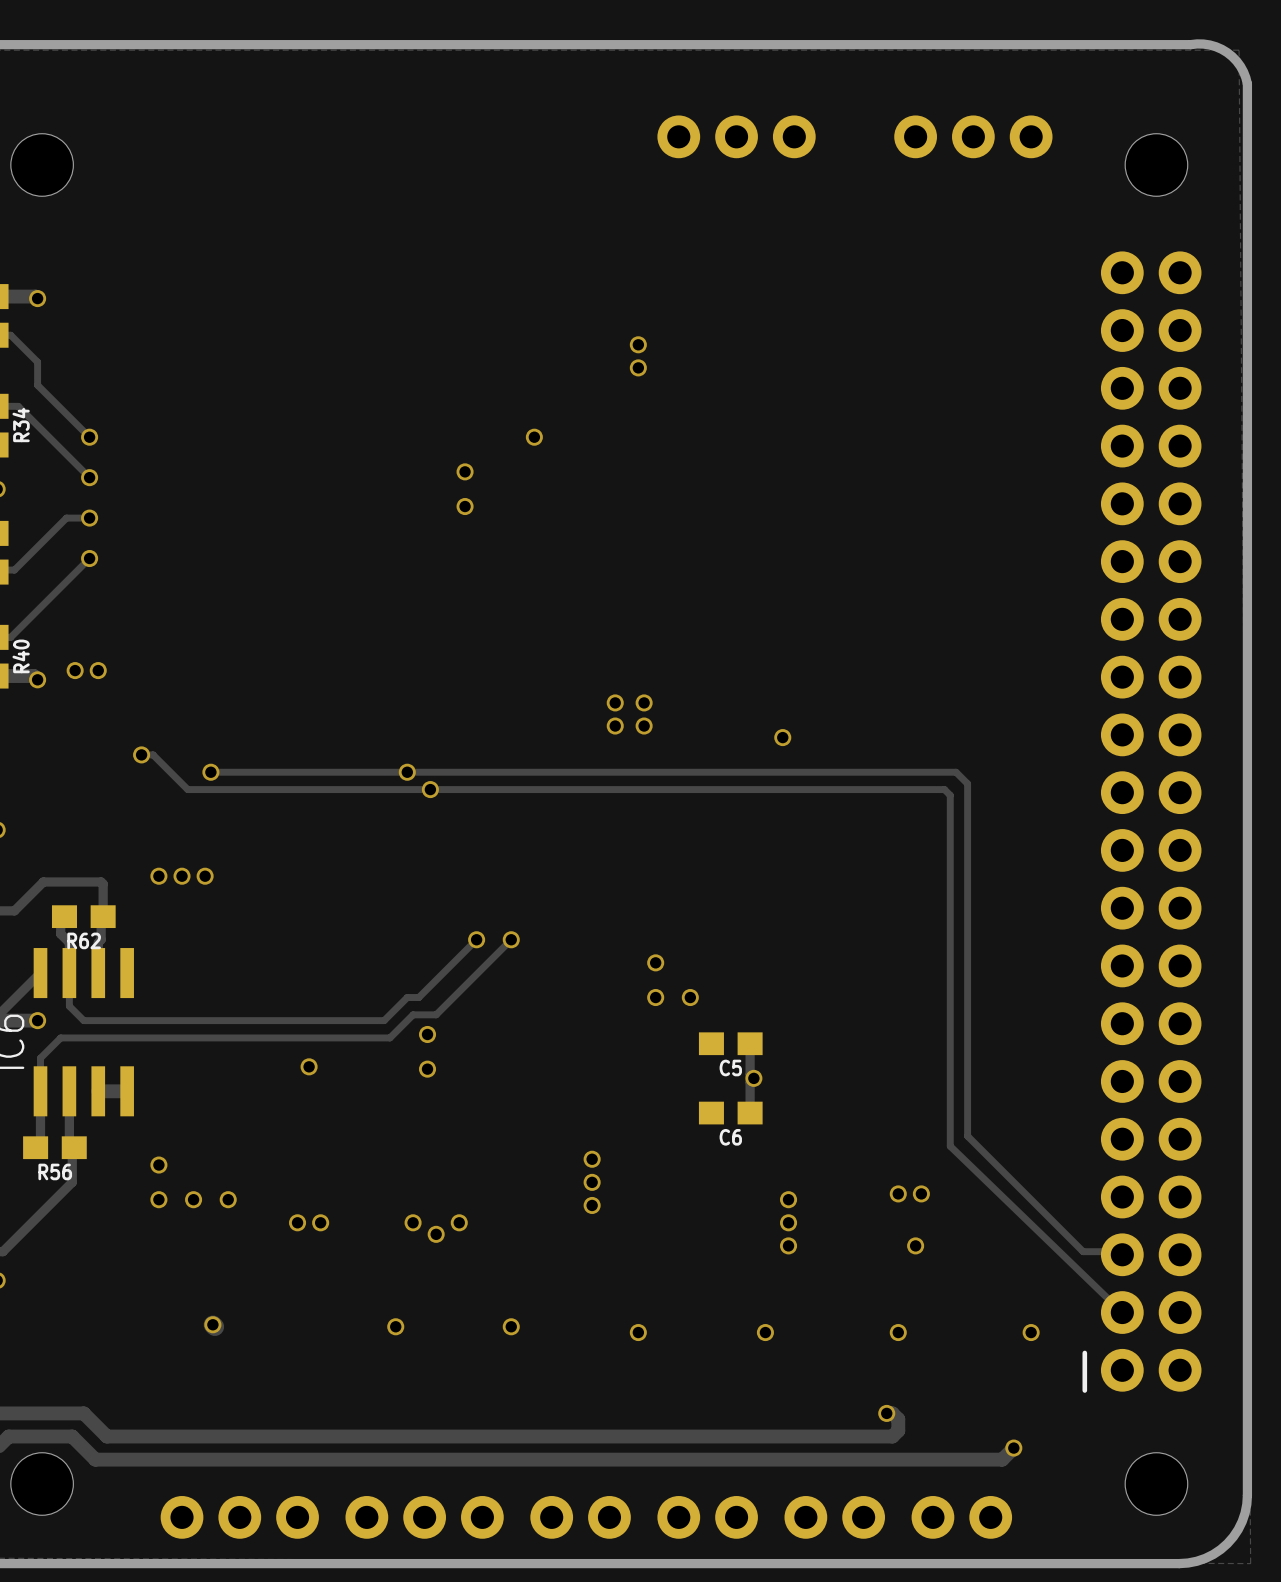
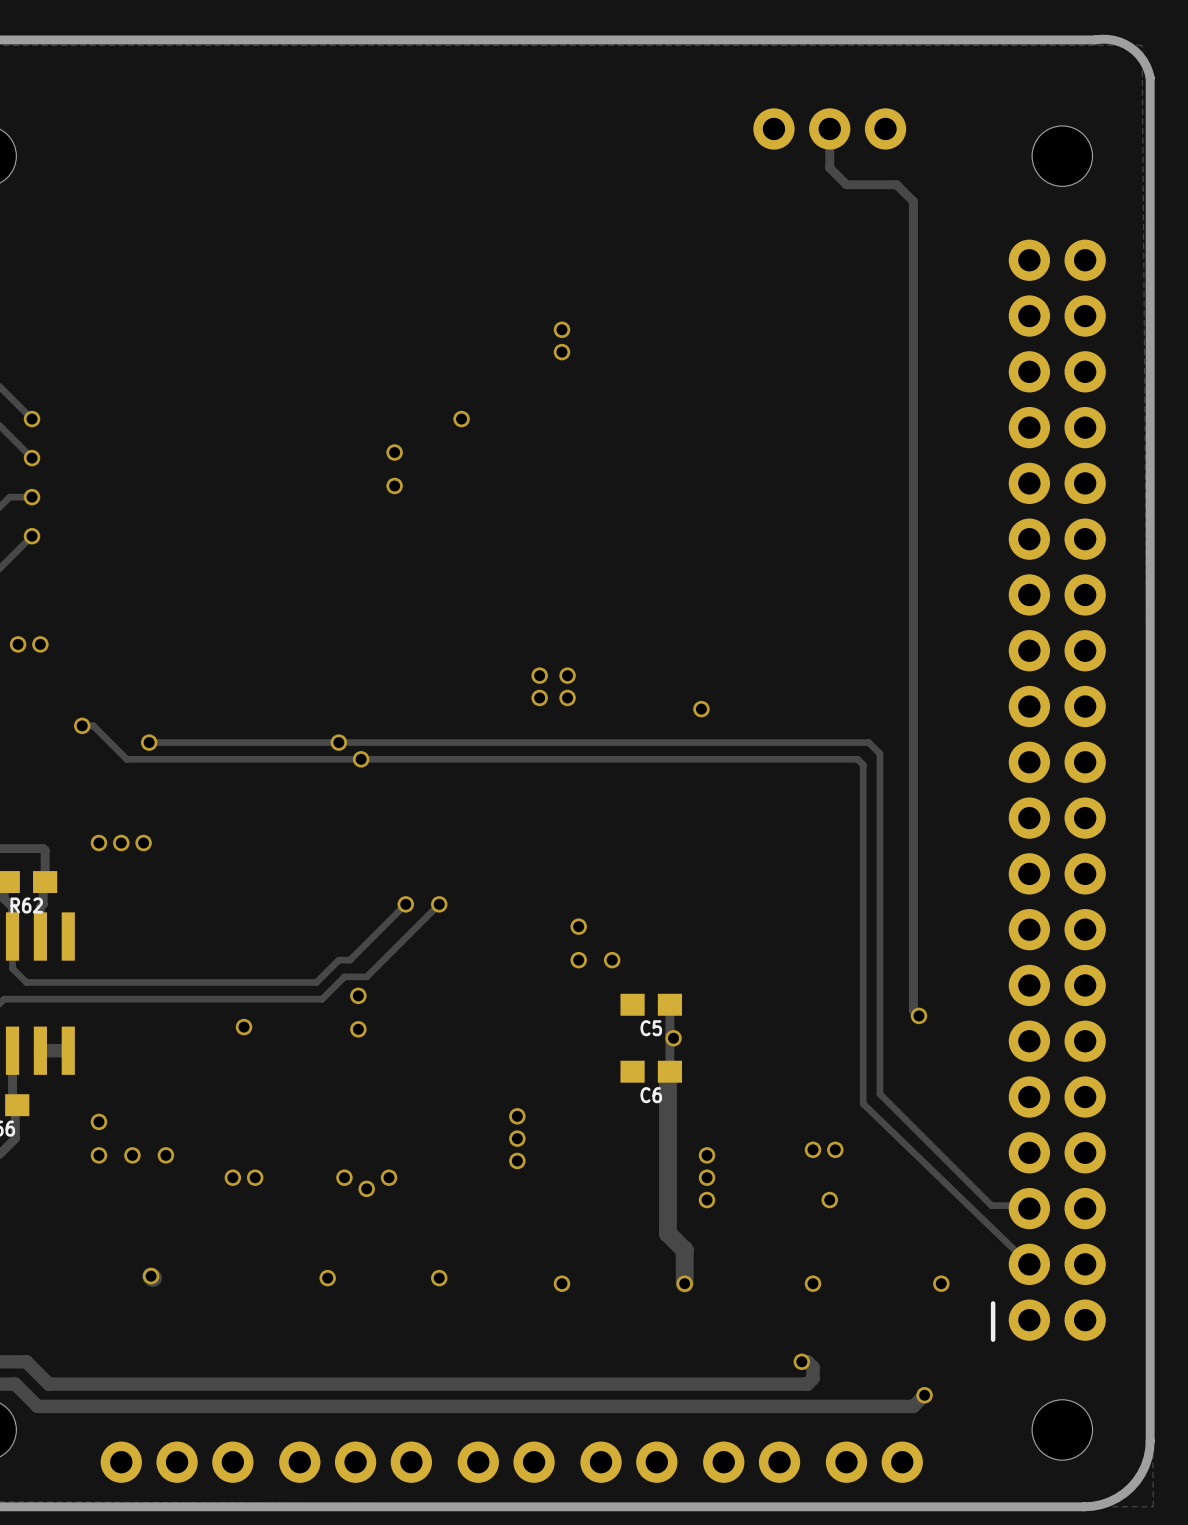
part: (736, 136) -> none
track: none -> (829, 128) (829, 168) (846, 184) (896, 184) (913, 201) (913, 1010) (919, 1015)
part position: (973, 136) -> (829, 128)
via: none -> (919, 1015)
track: none -> (669, 1071) (667, 1073) (667, 1233) (684, 1250) (684, 1283)

